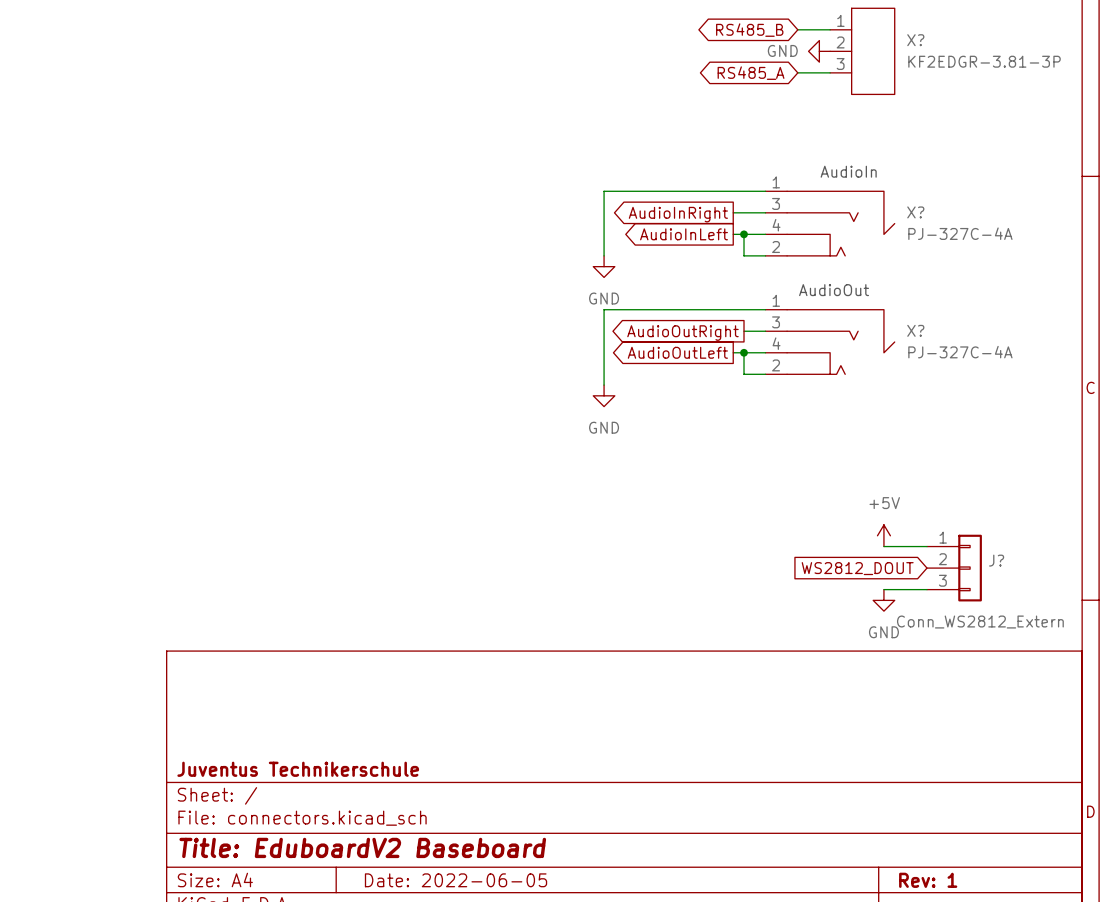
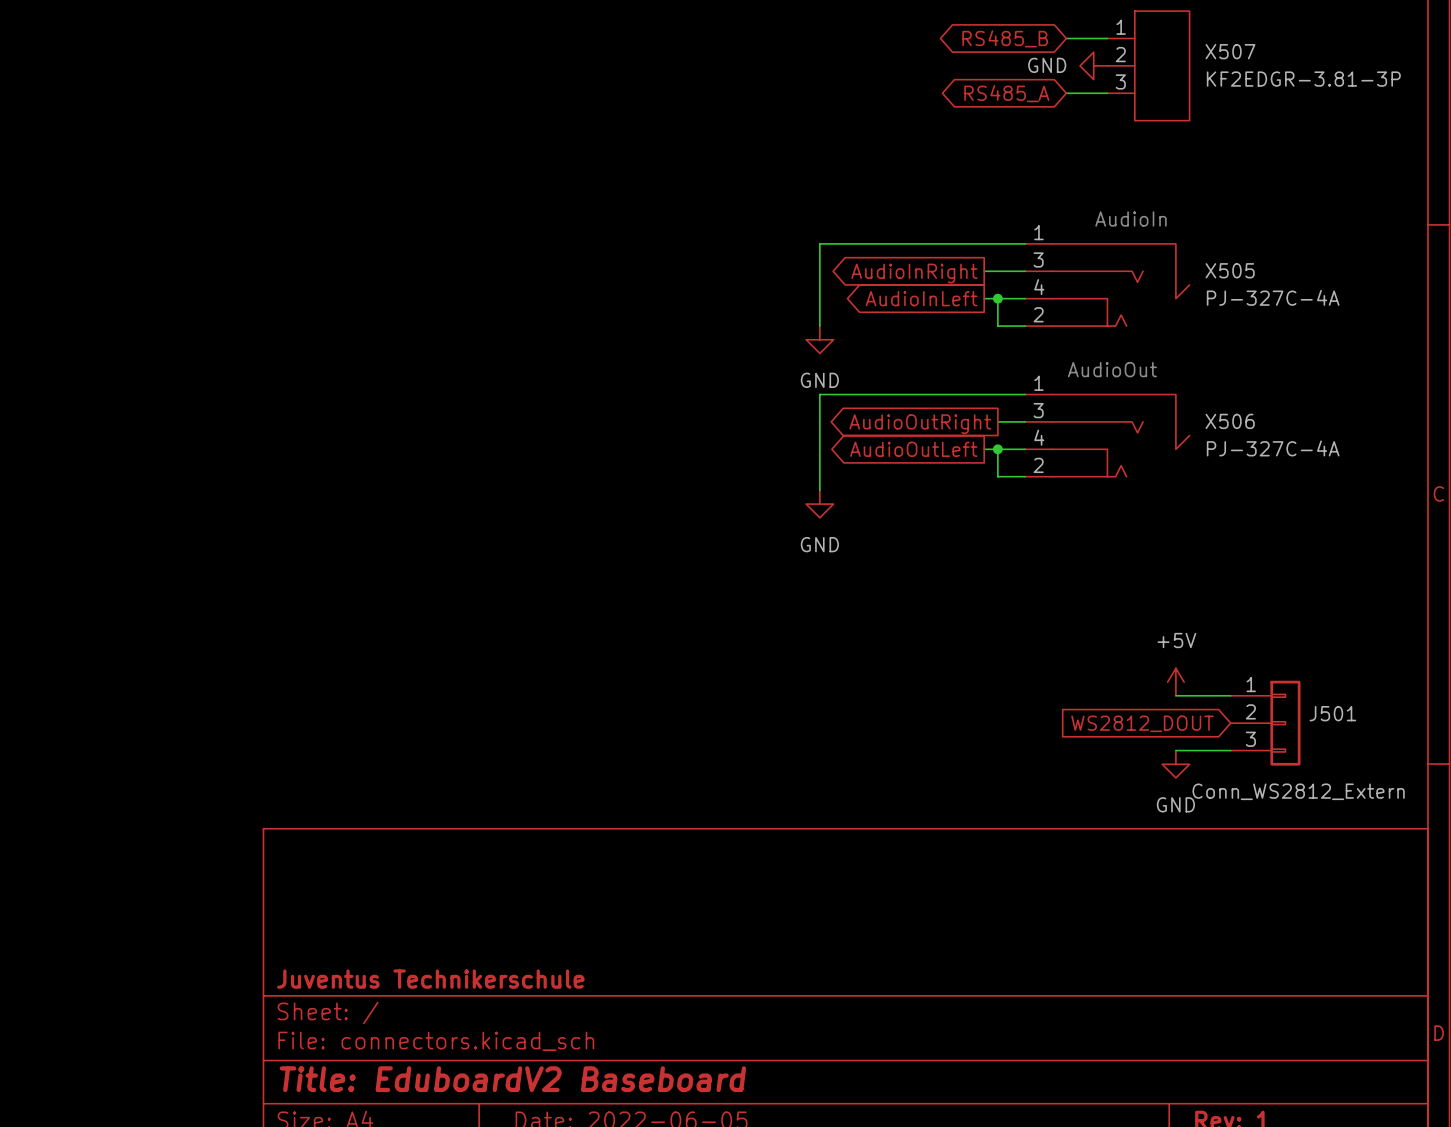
X? name: X? (915, 40) -> X507 (1230, 51)
X? name: X? (915, 212) -> X505 (1230, 270)
X? name: X? (915, 330) -> X506 (1230, 421)
J? name: J? (996, 560) -> J501 (1332, 713)

